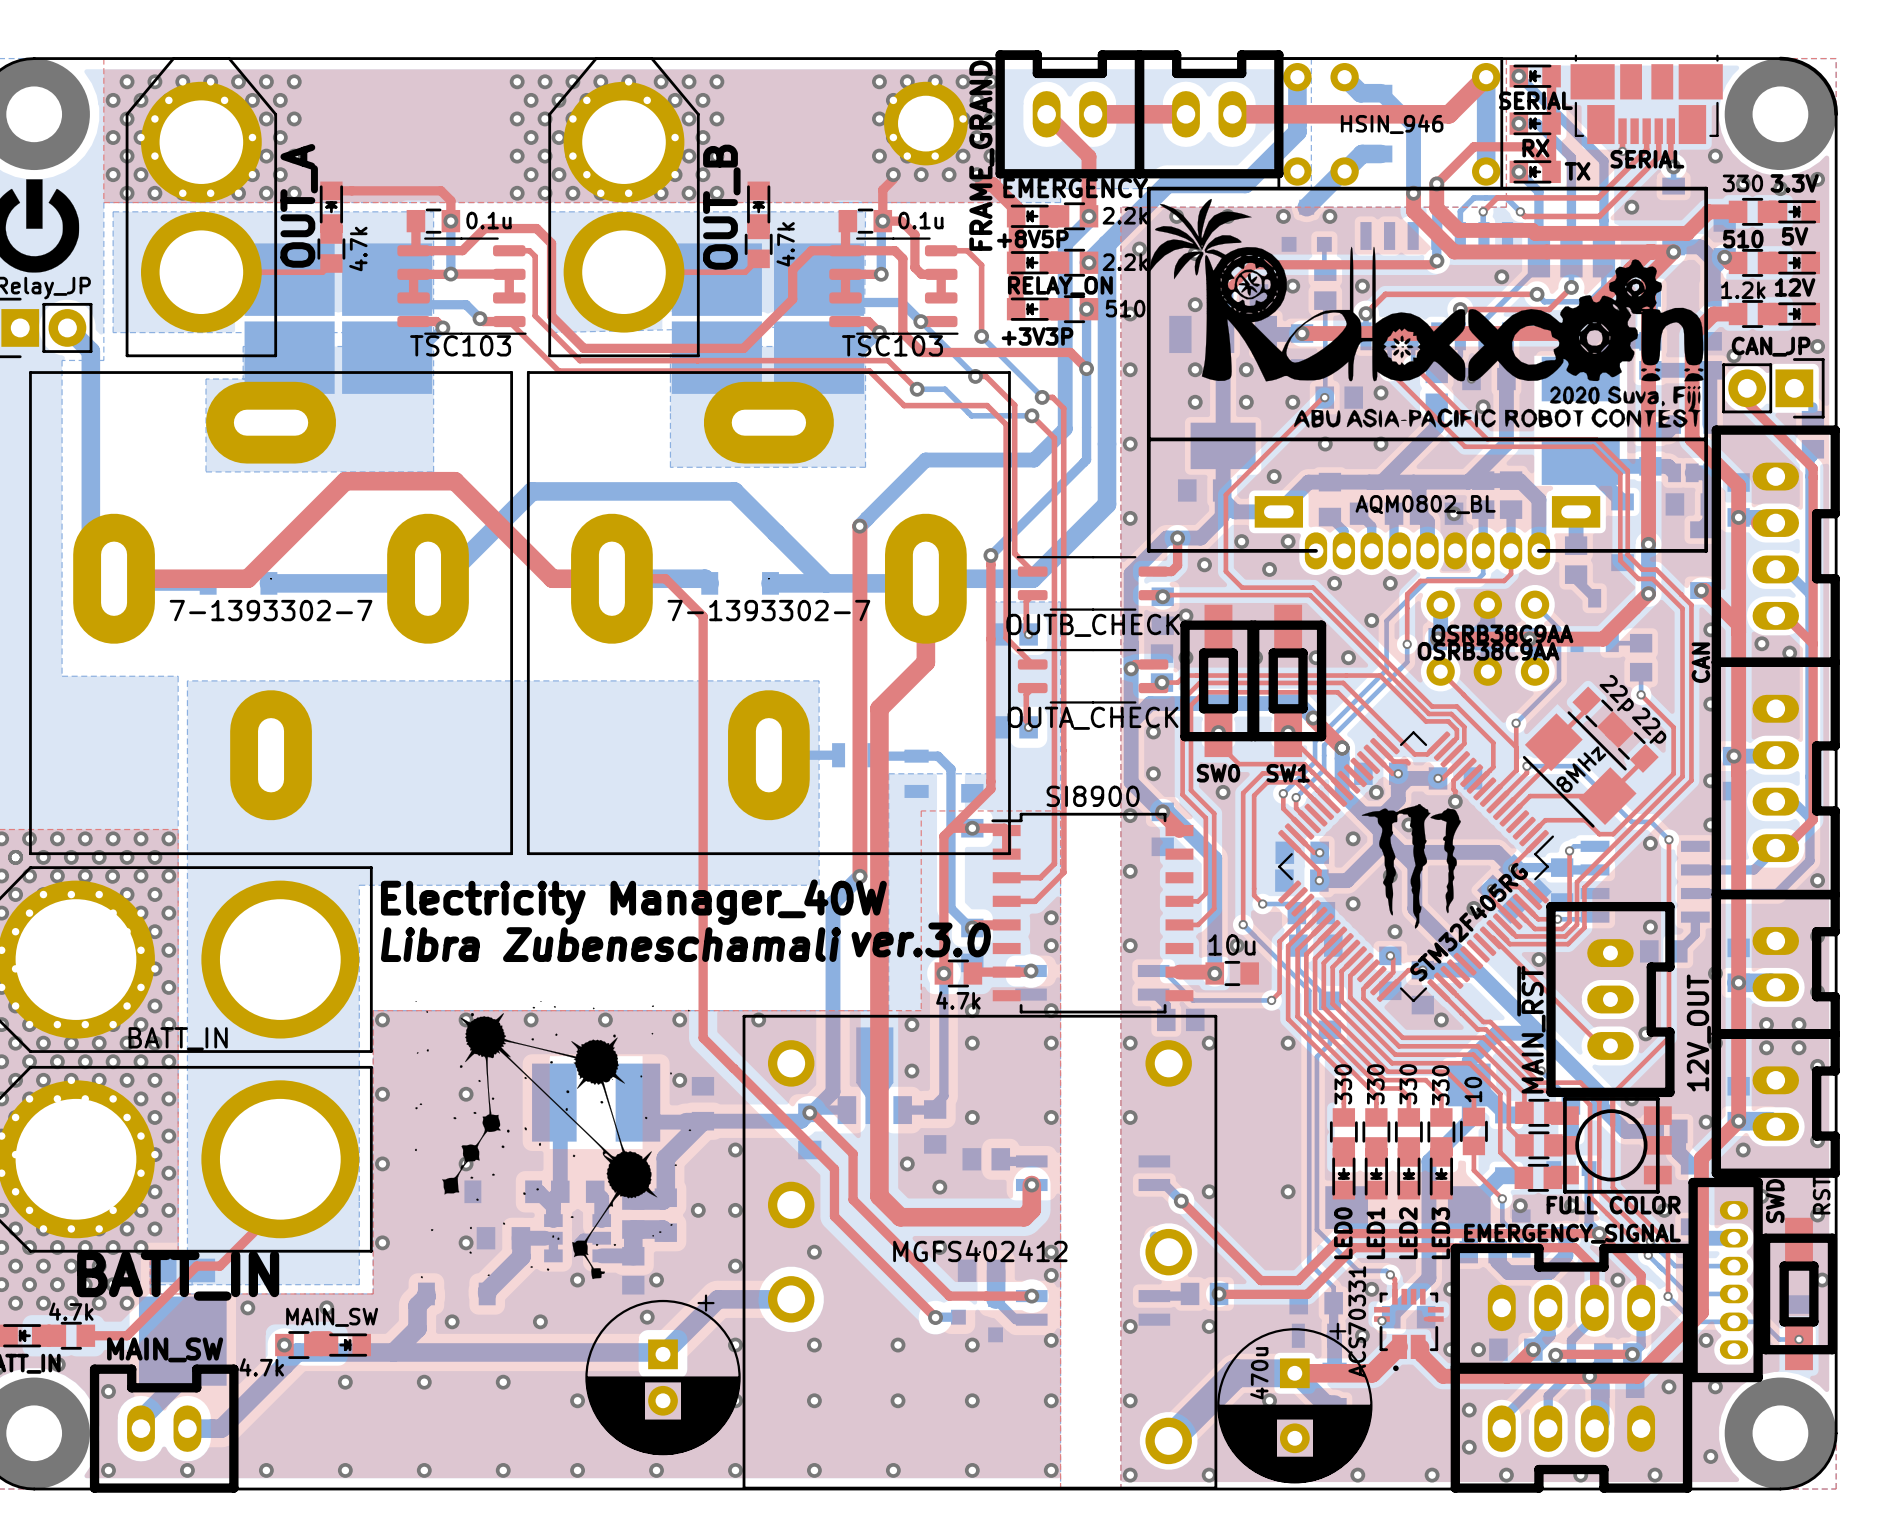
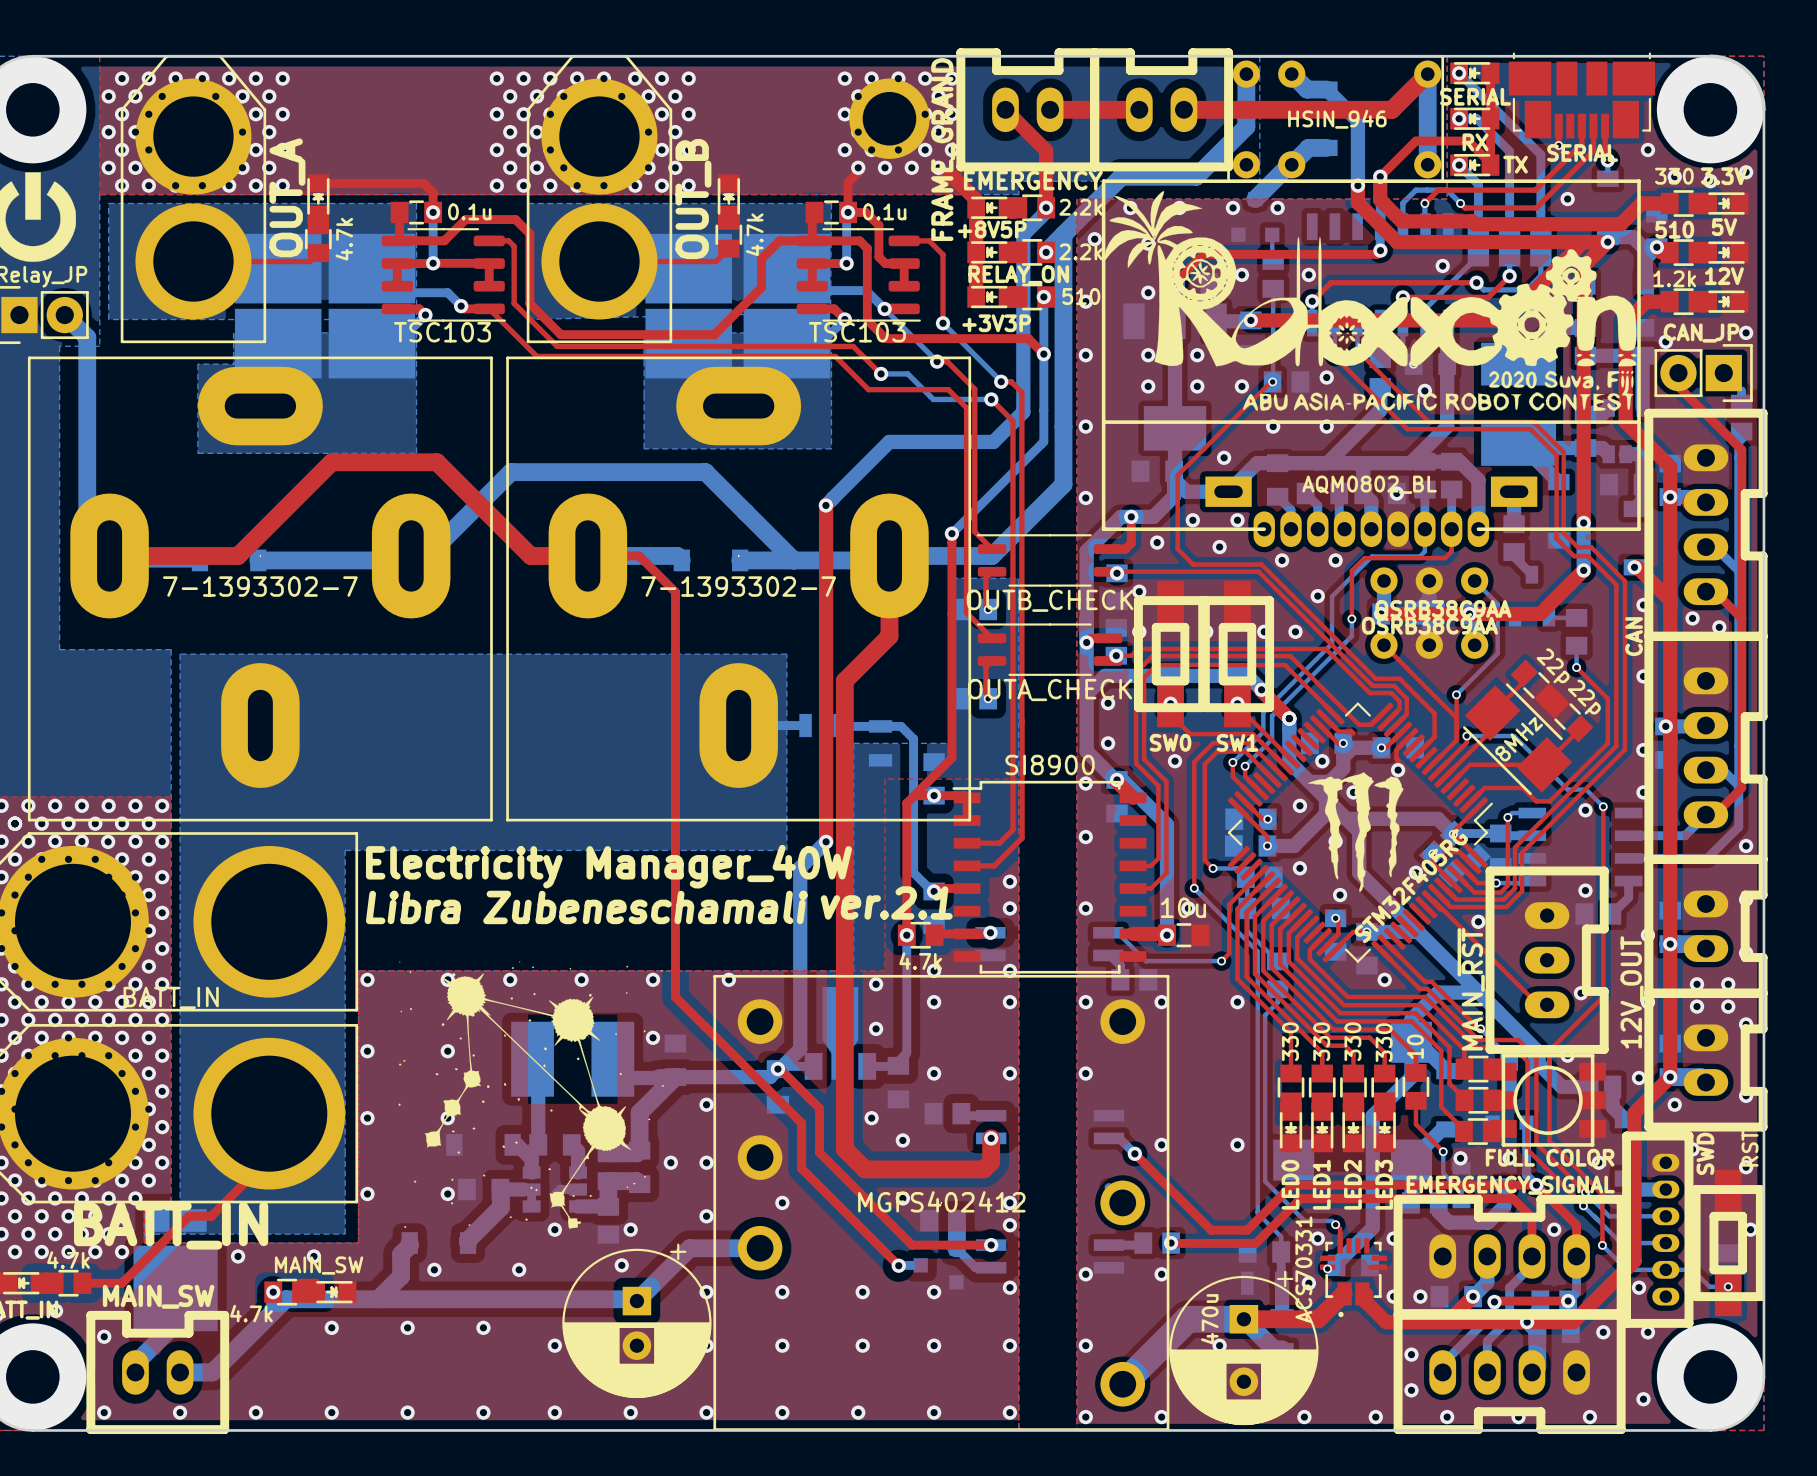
text: ver.3.0 (921, 939) -> ver.2.1 (886, 902)

